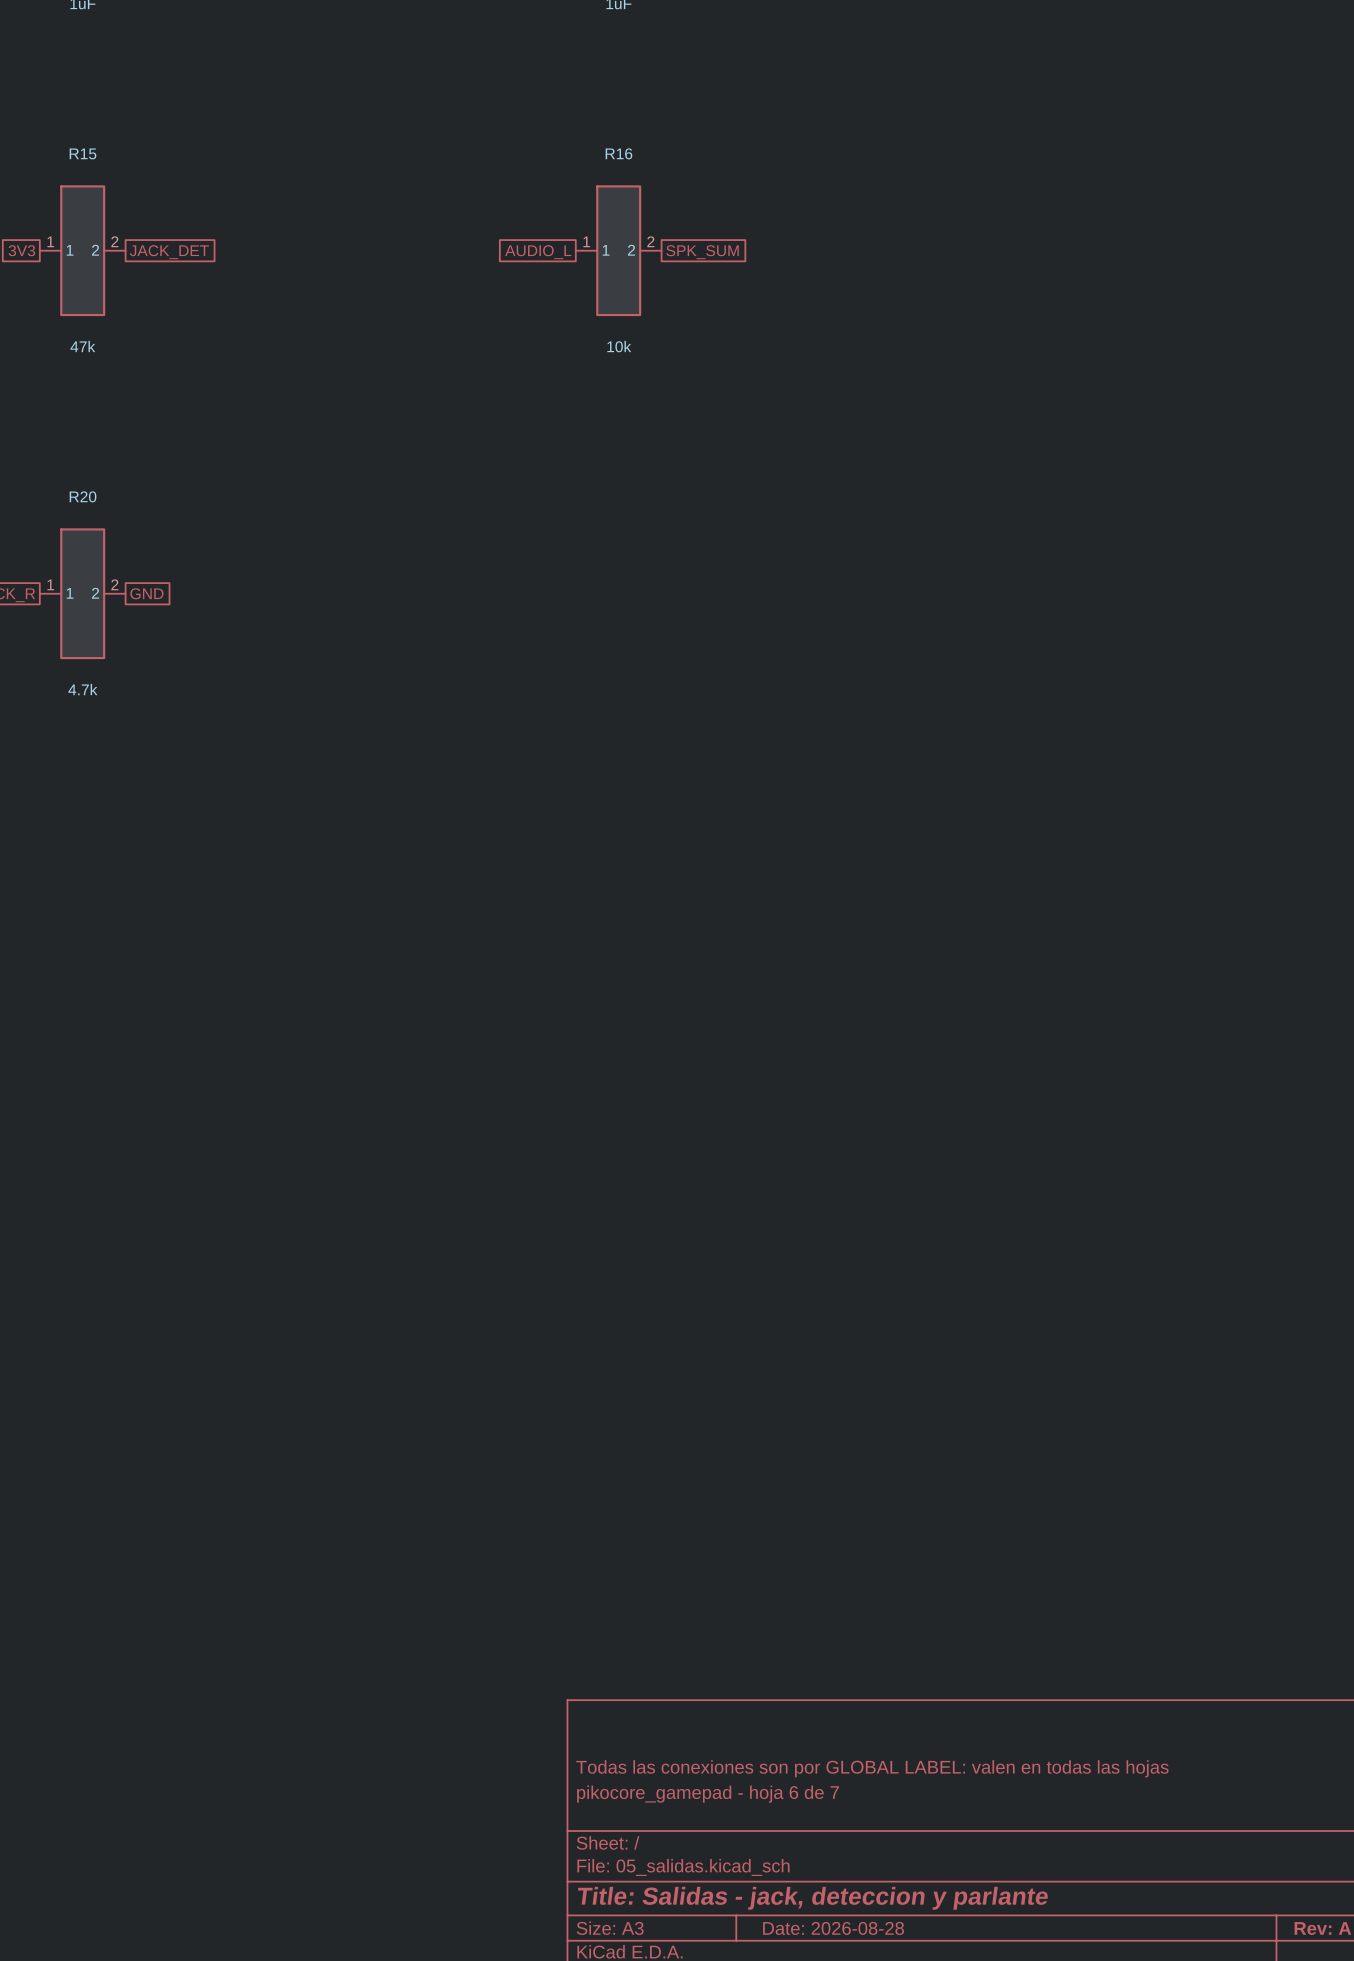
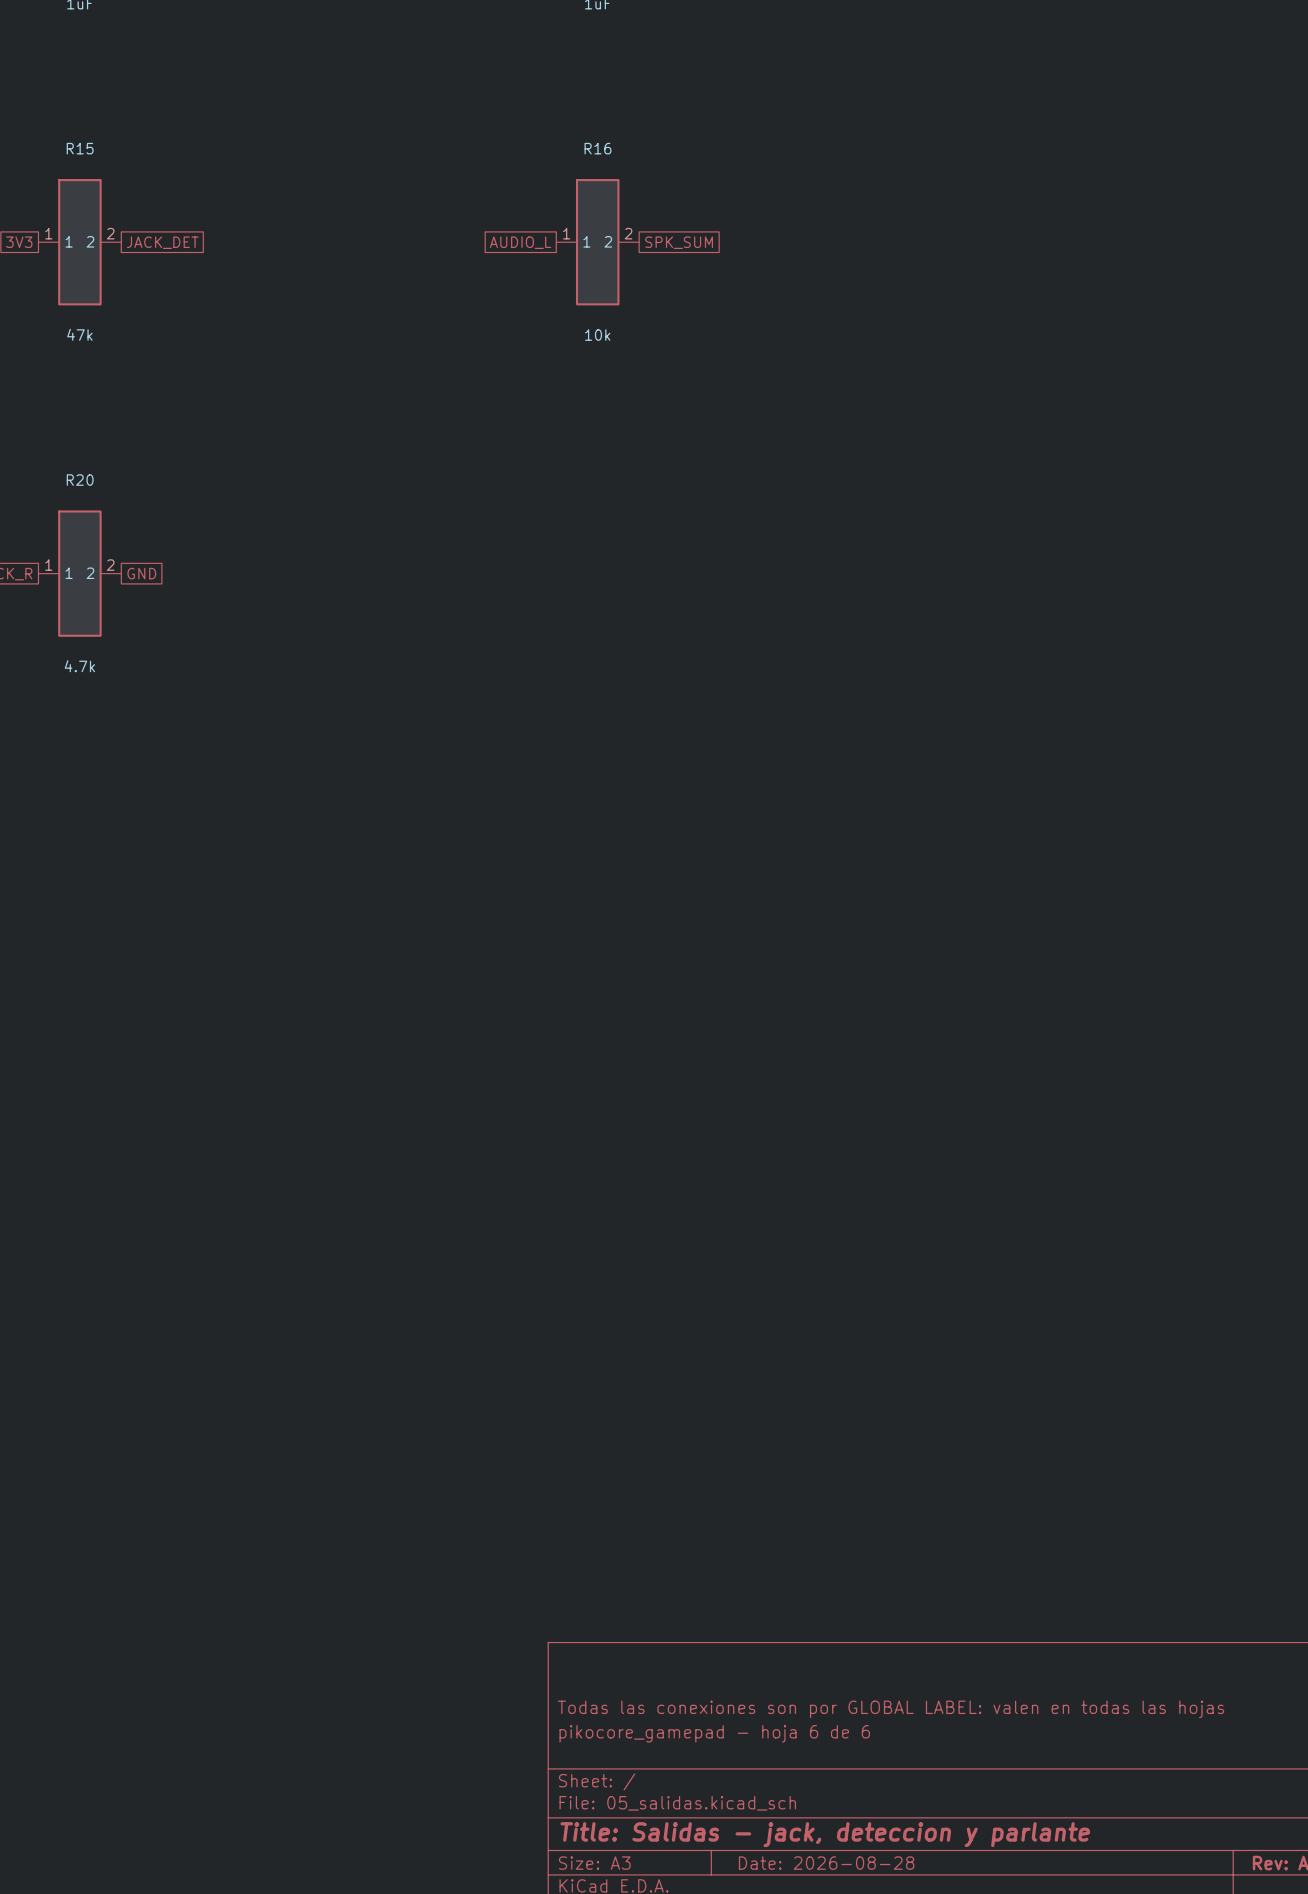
title block: pikocore_gamepad - hoja 6 de 7 (708, 1794) -> pikocore_gamepad - hoja 6 de 6 (714, 1733)

